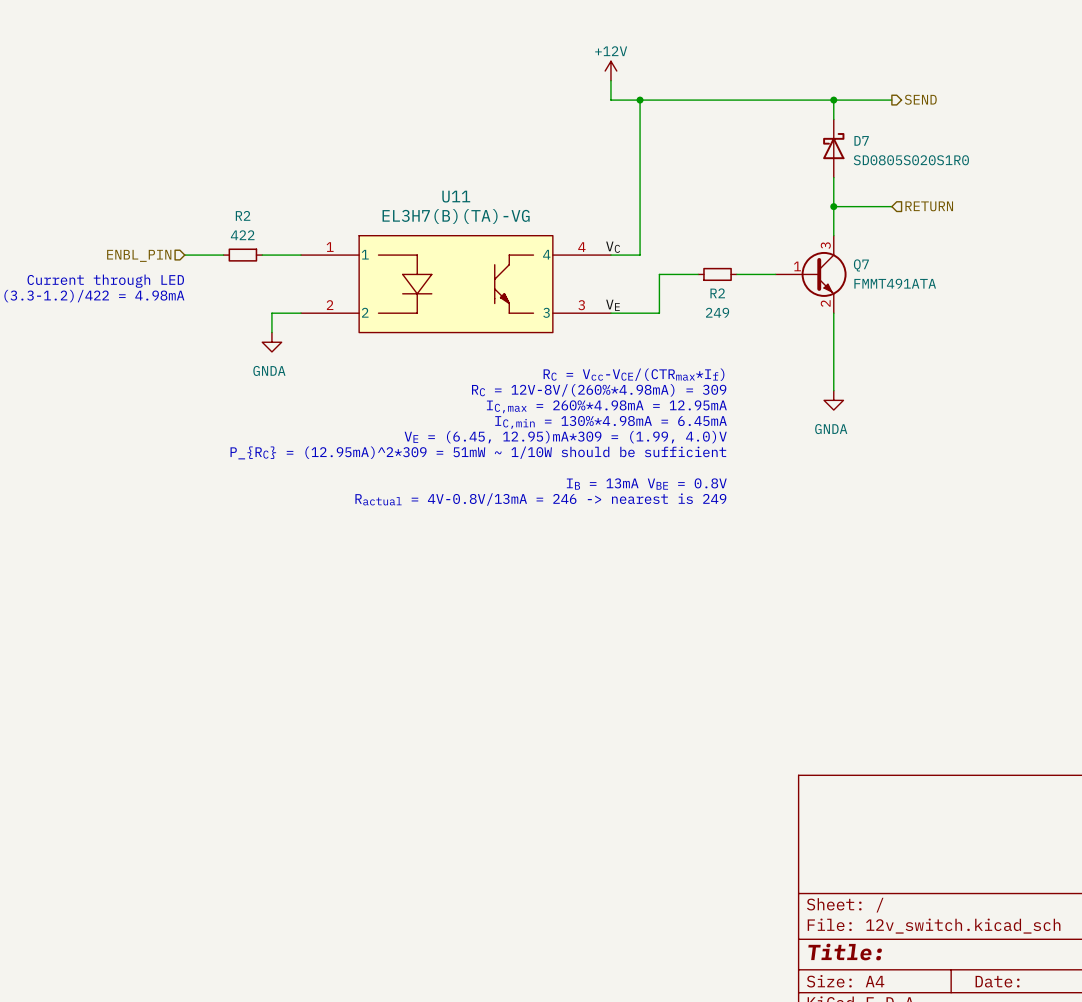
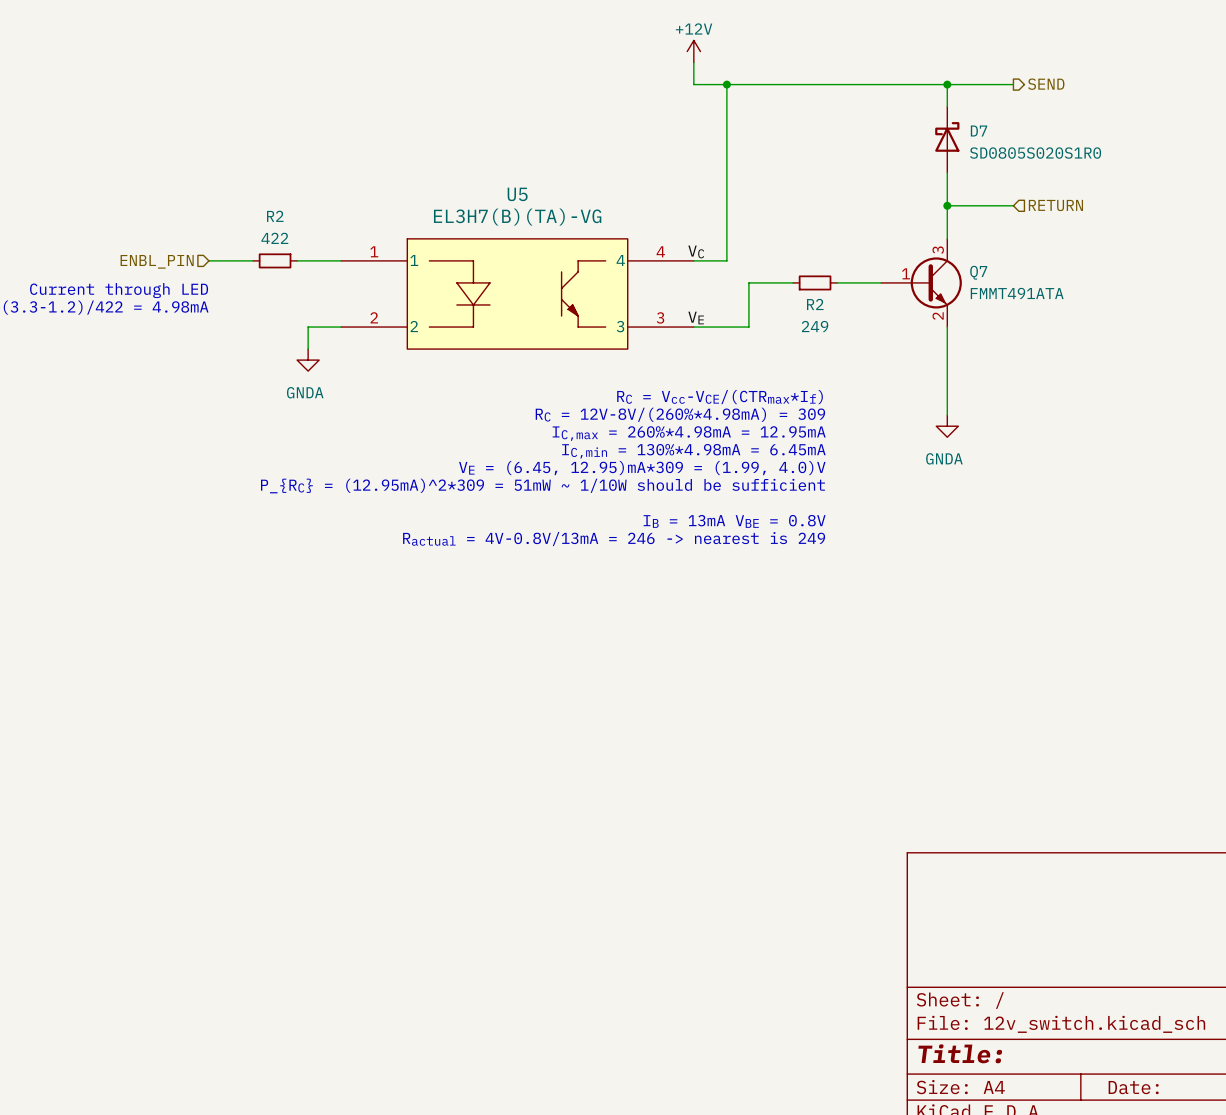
U11 name: U11 (456, 196) -> U5 (517, 194)

